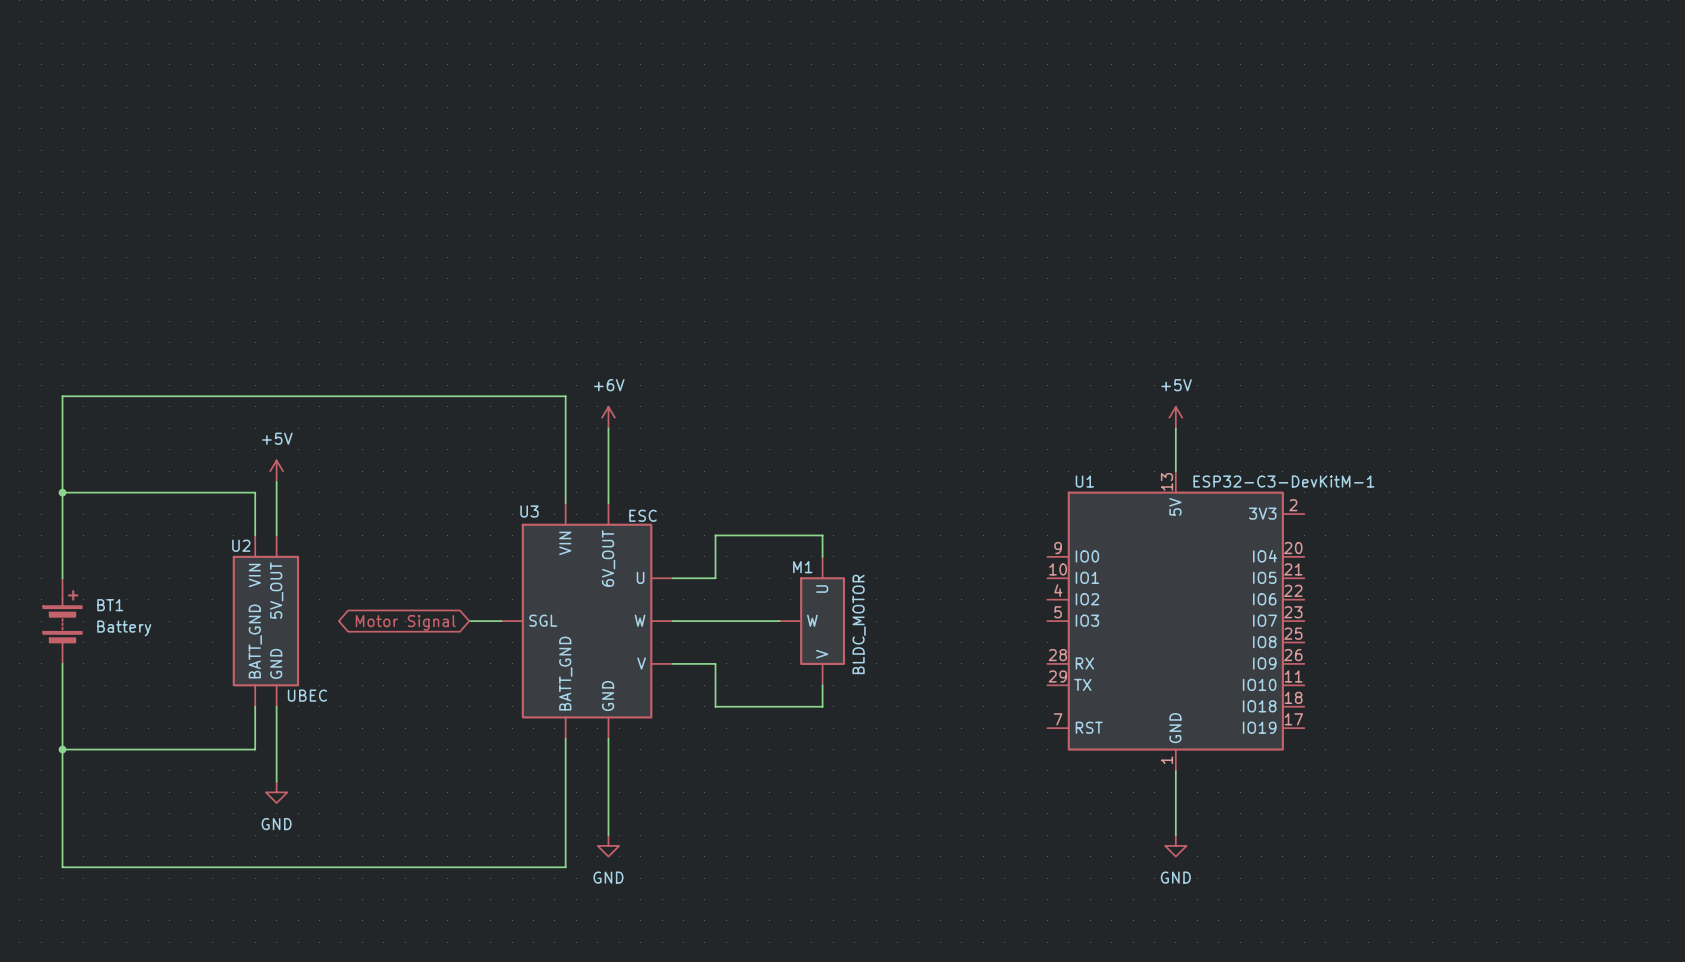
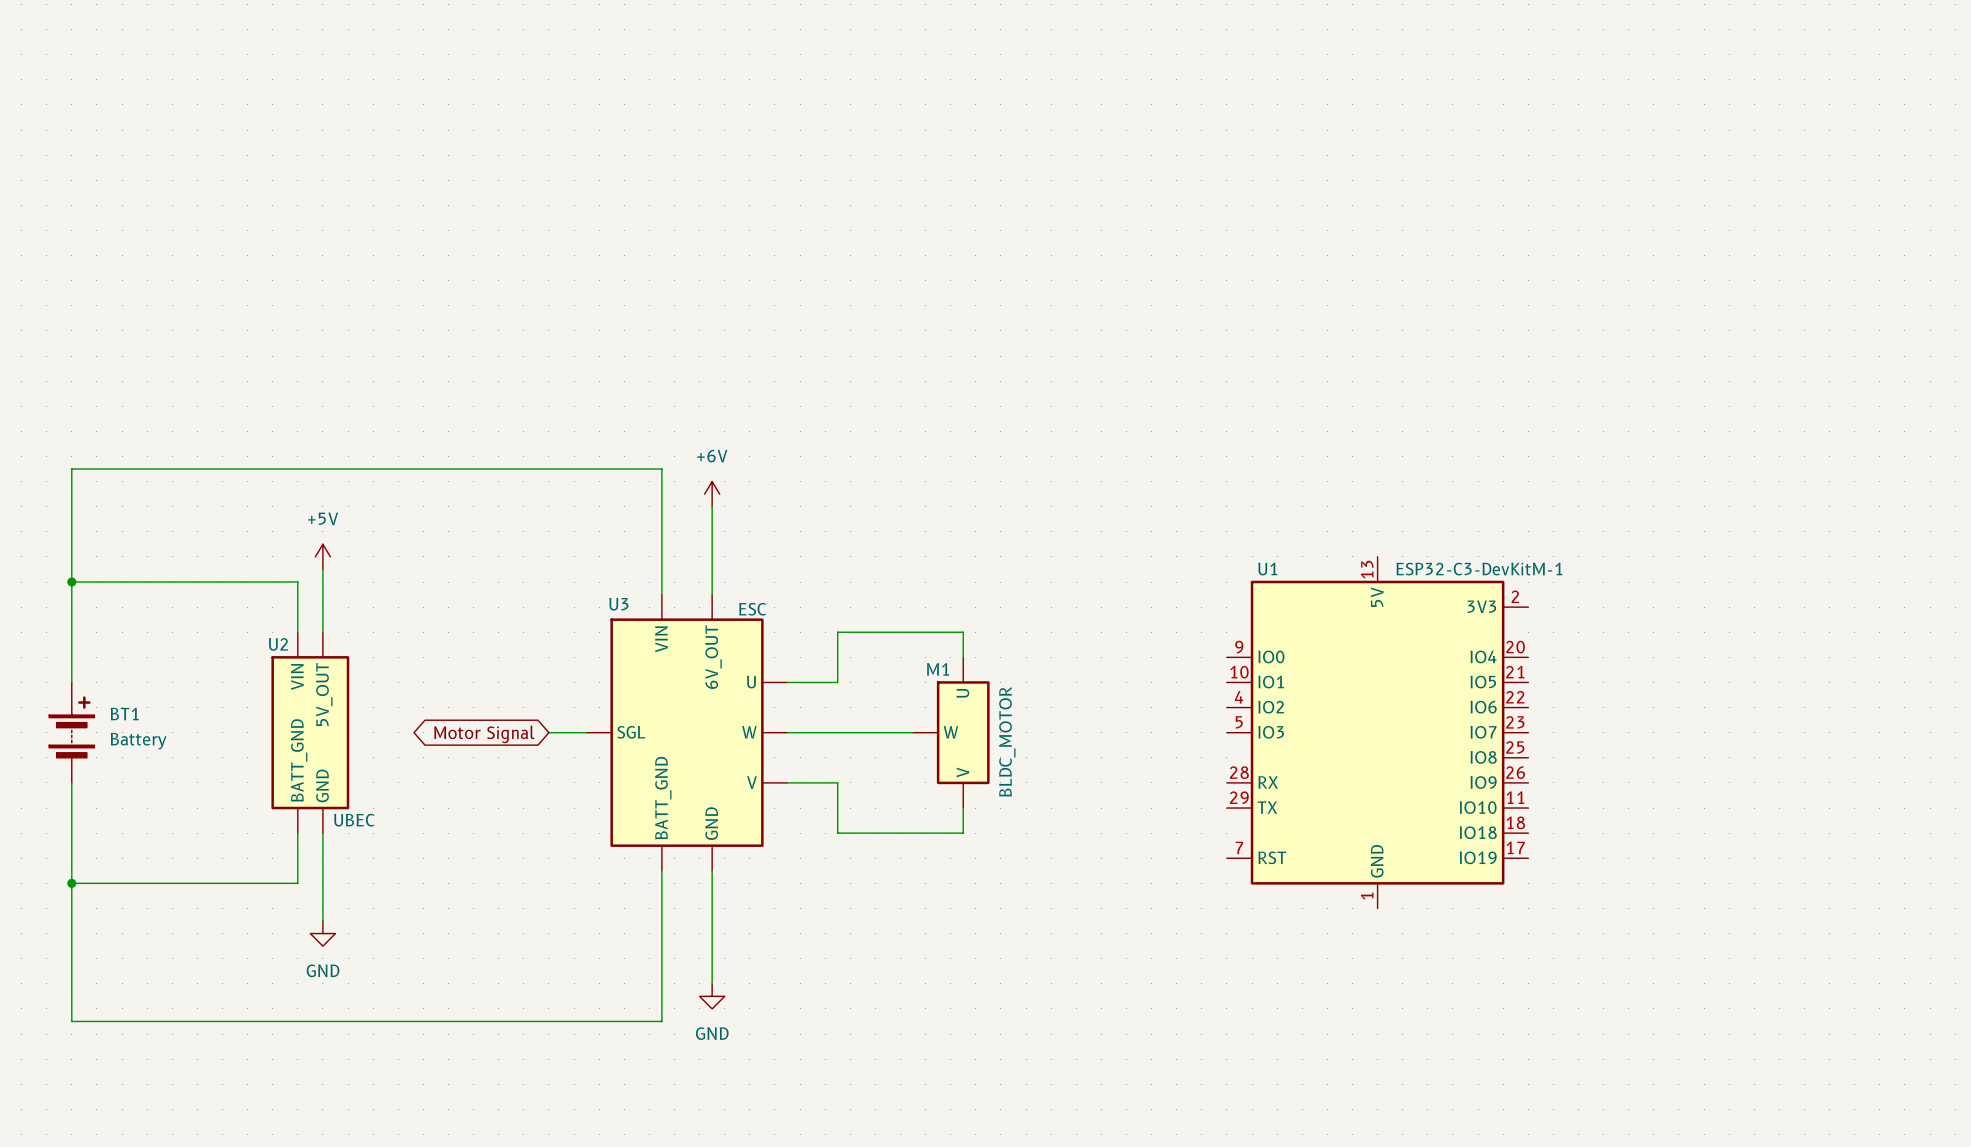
power symbol: +5V (1175, 417) -> none
wire: (1175, 428) (1175, 471) -> none
wire: (1175, 770) (1175, 835) -> none
power symbol: GND (1175, 845) -> none

